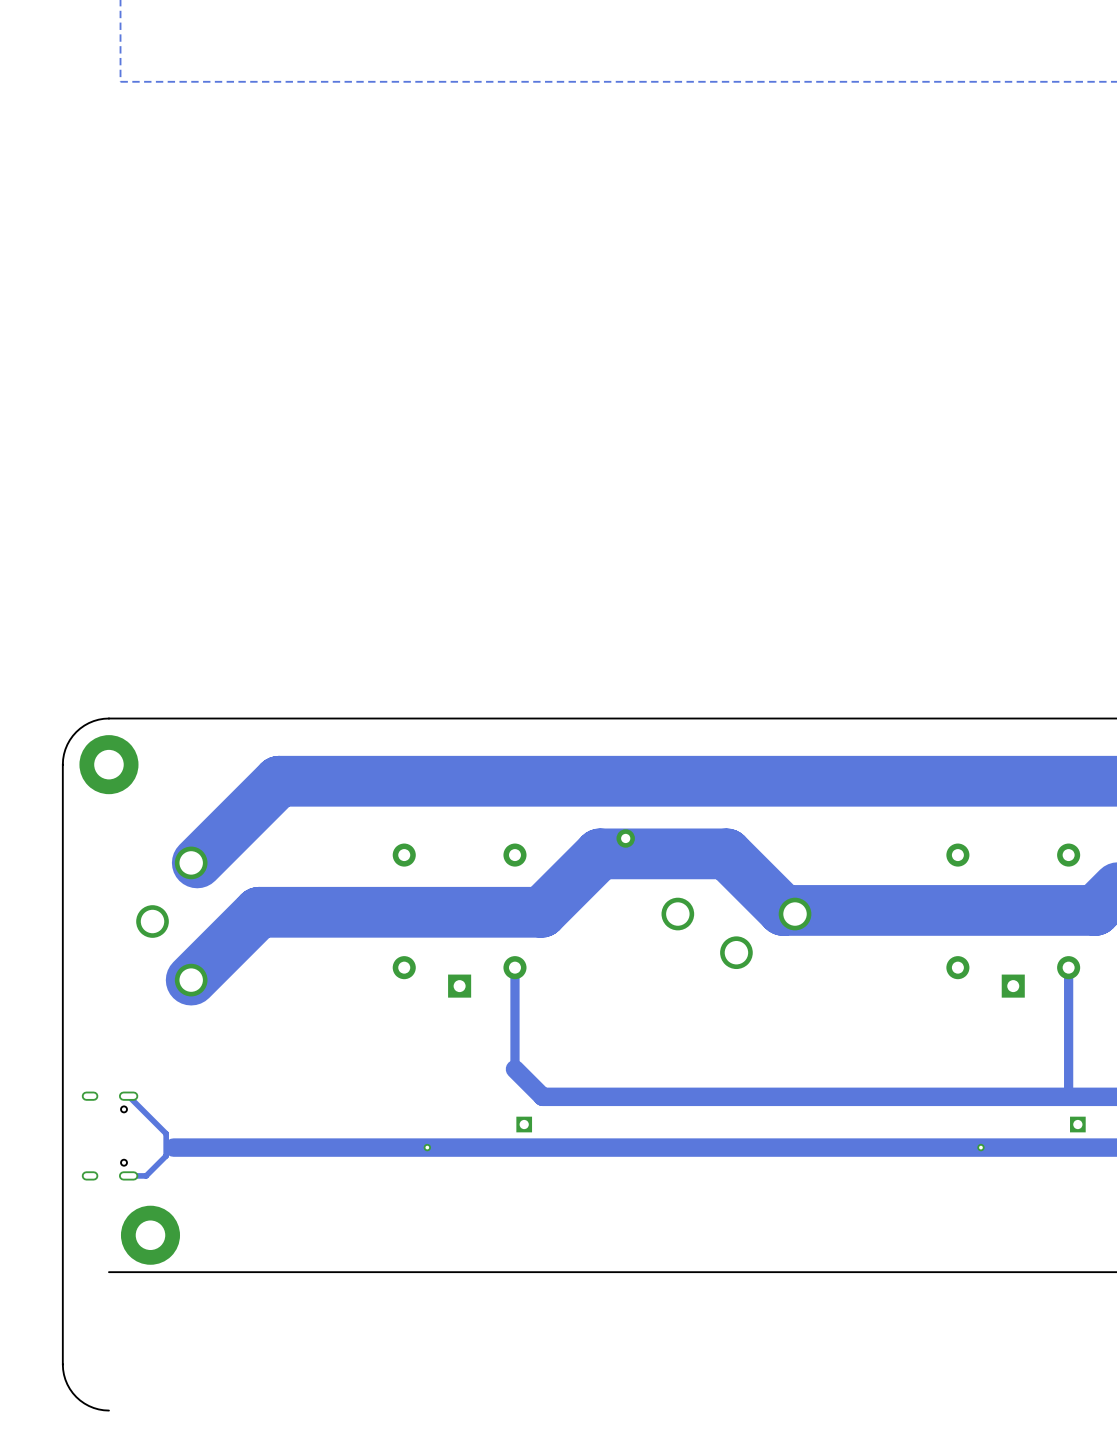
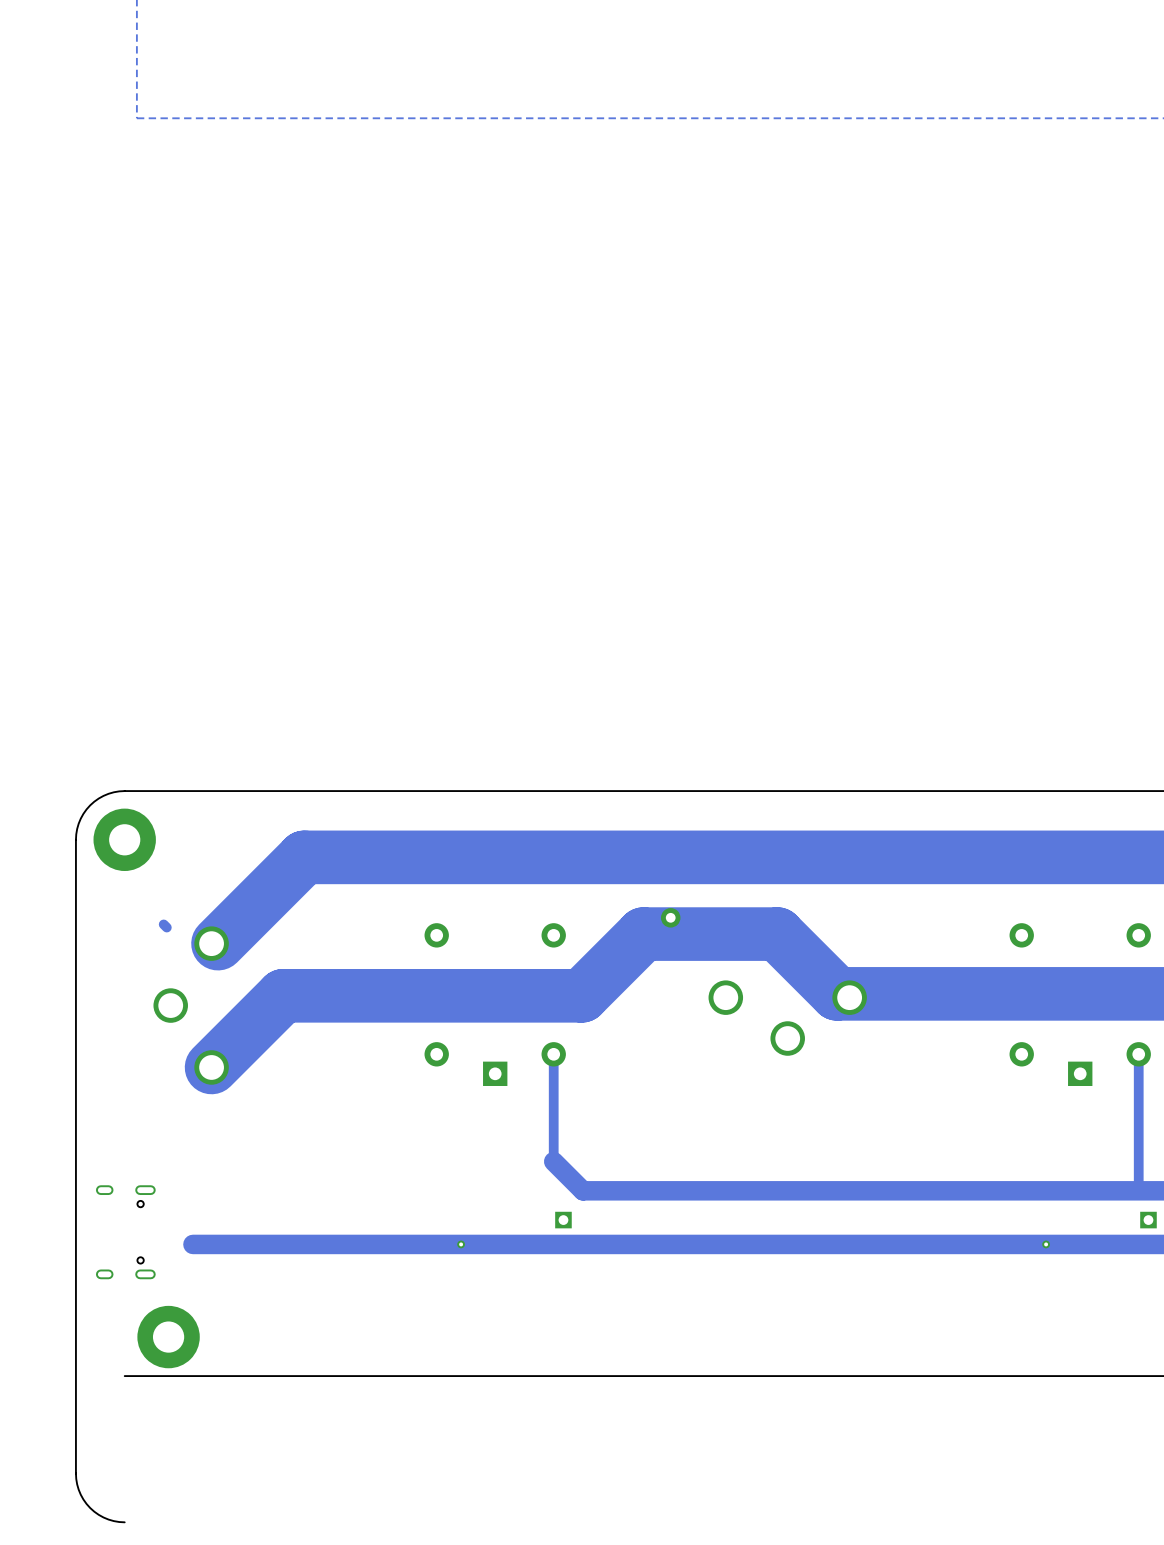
track: none -> (163, 924) (166, 927)
track: (128, 1096) (166, 1133) (166, 1155) -> none
track: (166, 1155) (146, 1175) (128, 1175) -> none

